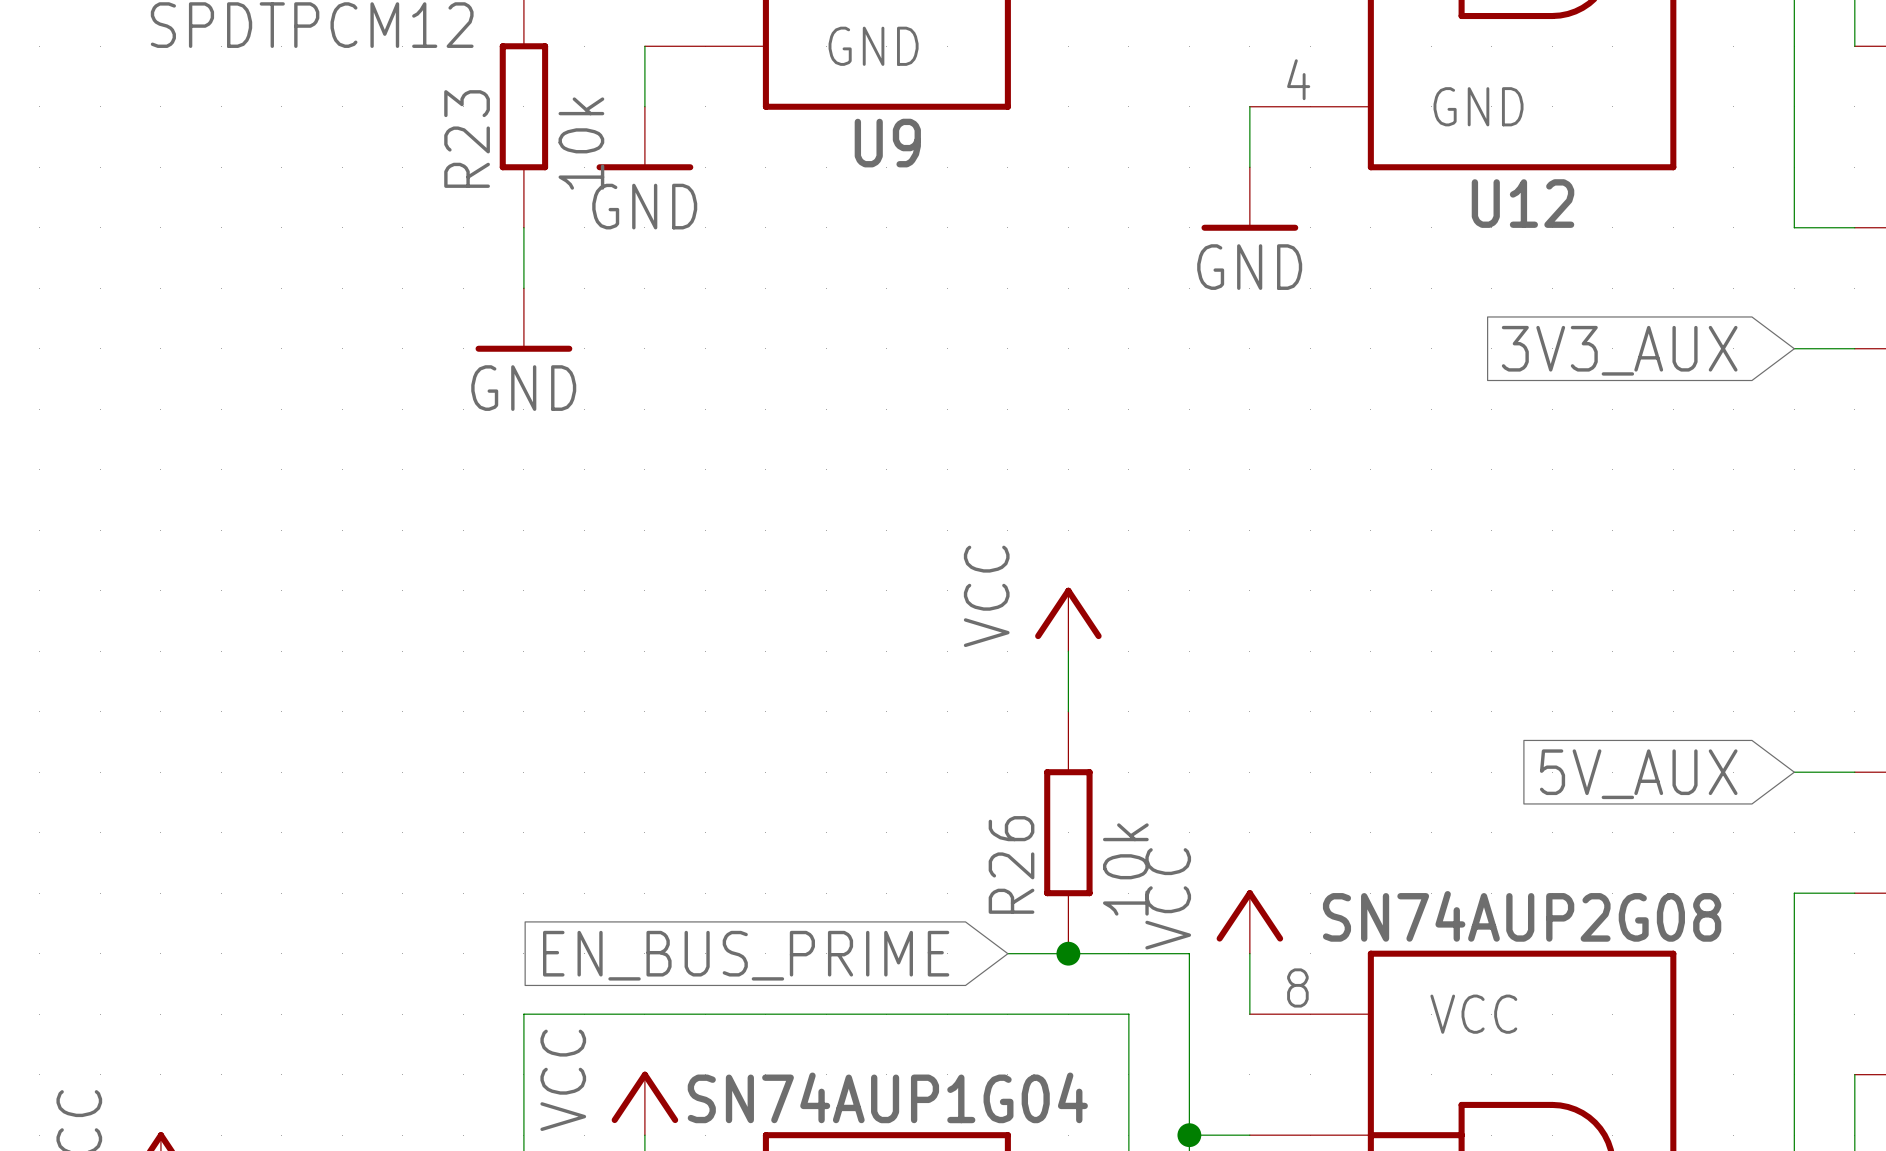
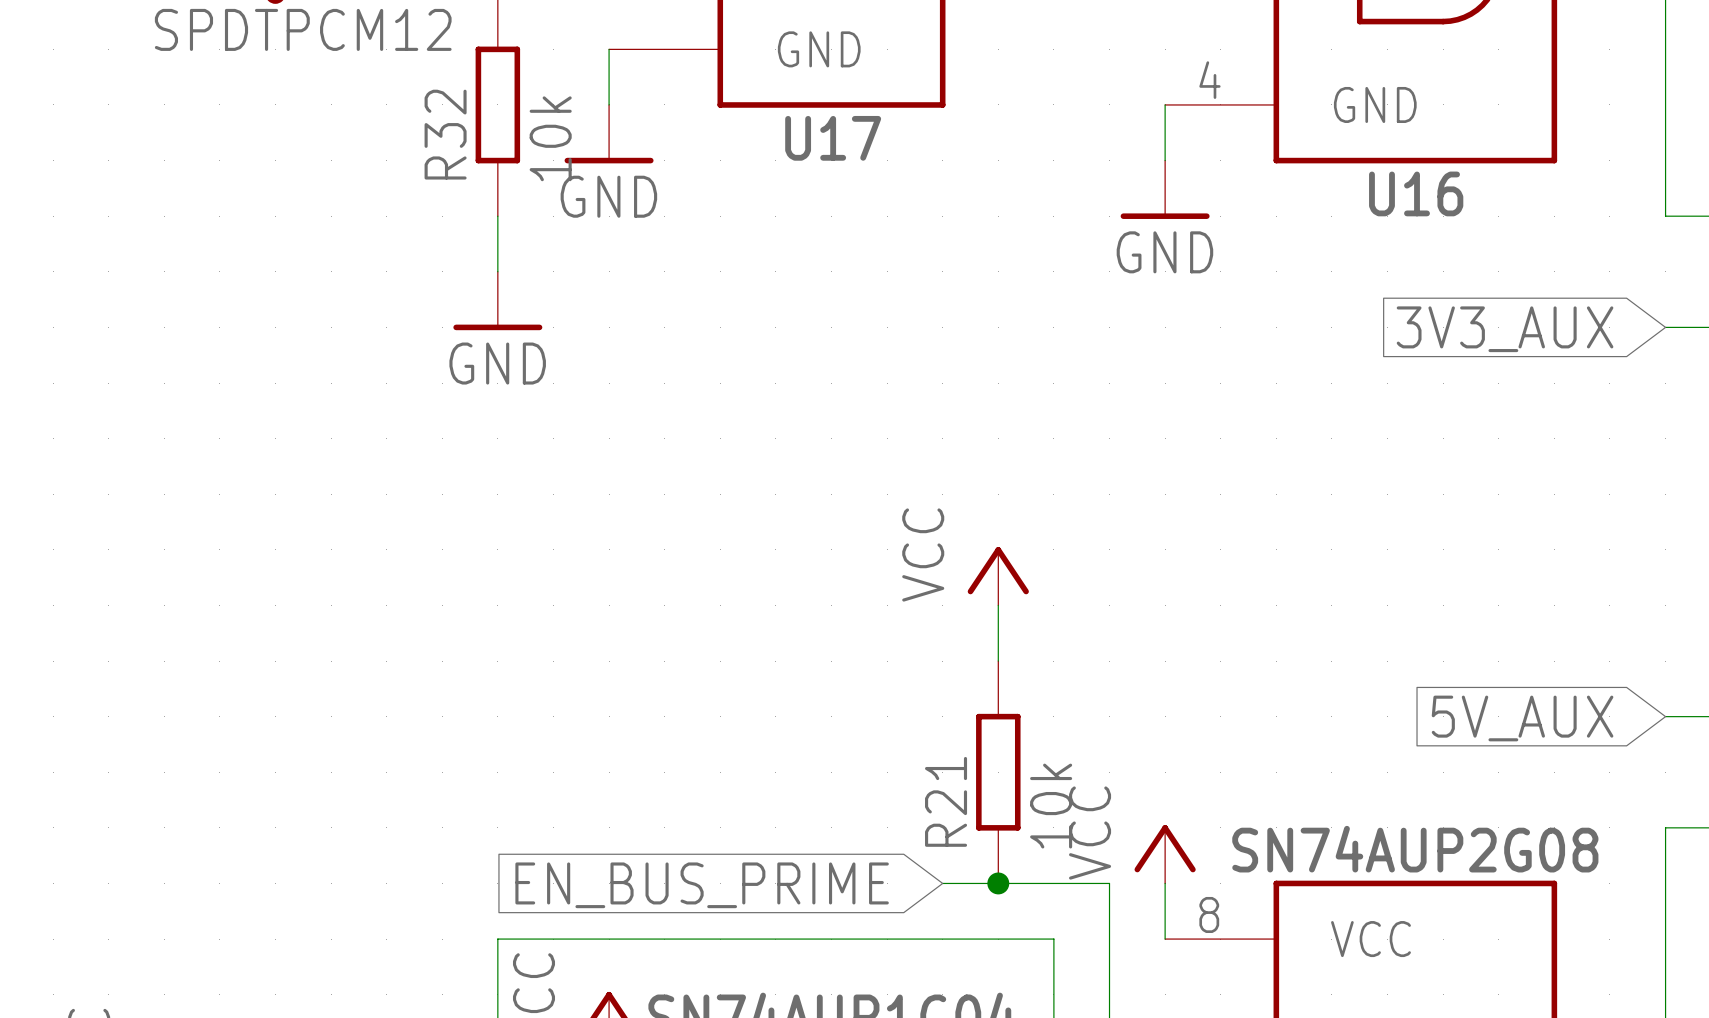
R23 name: R23 (467, 139) -> R32 (445, 134)
U9 name: U9 (887, 143) -> U17 (833, 138)
U12 name: U12 (1523, 203) -> U16 (1416, 193)
R26 name: R26 (1011, 864) -> R21 (946, 801)

